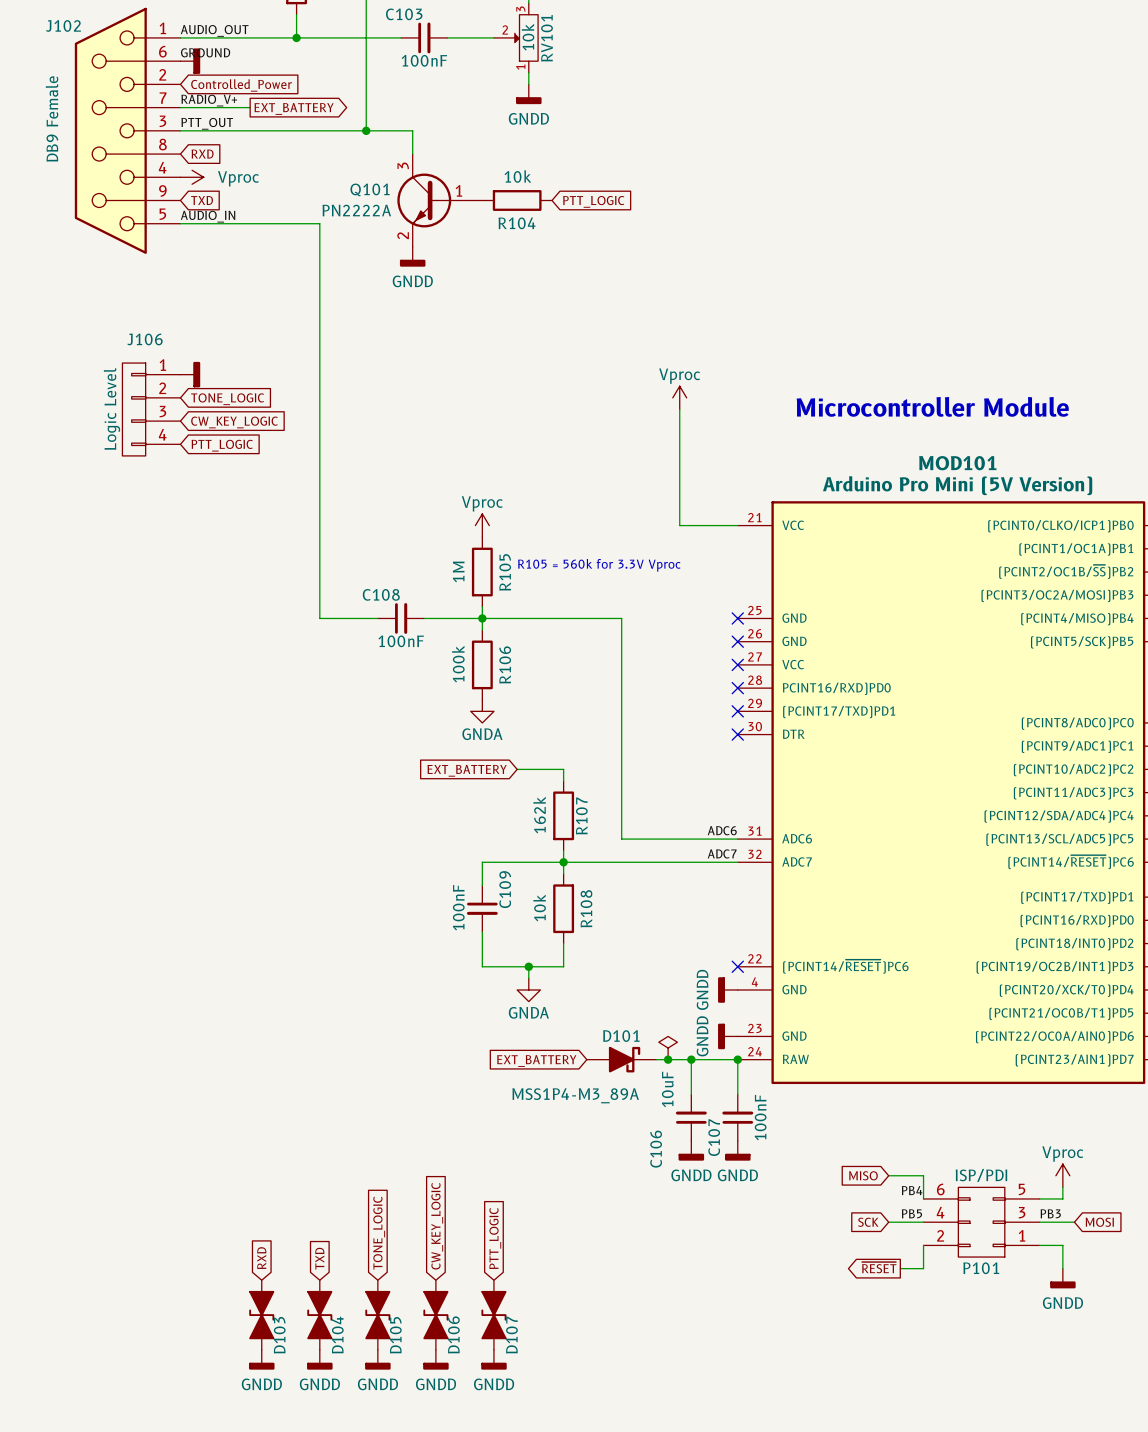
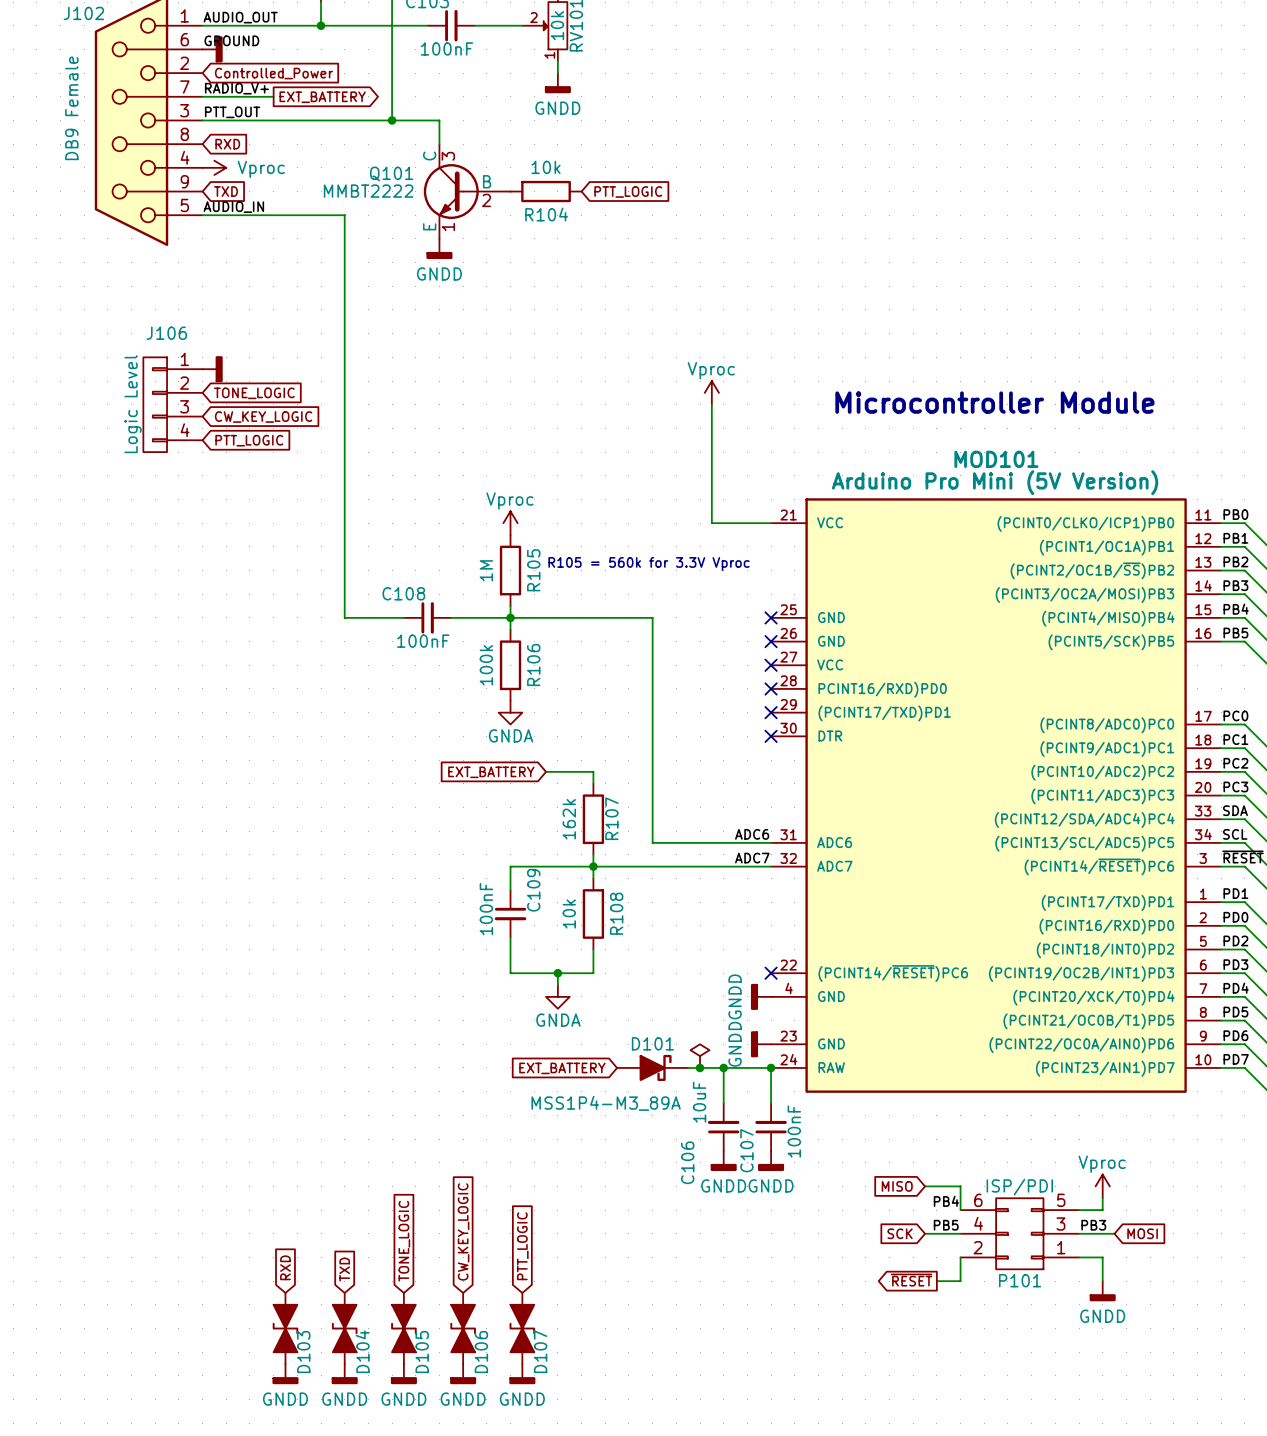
Q101 symbol: [397, 154, 483, 247] -> [423, 144, 511, 239]
Q101 value: PN2222A (356, 210) -> MMBT2222 (368, 191)

